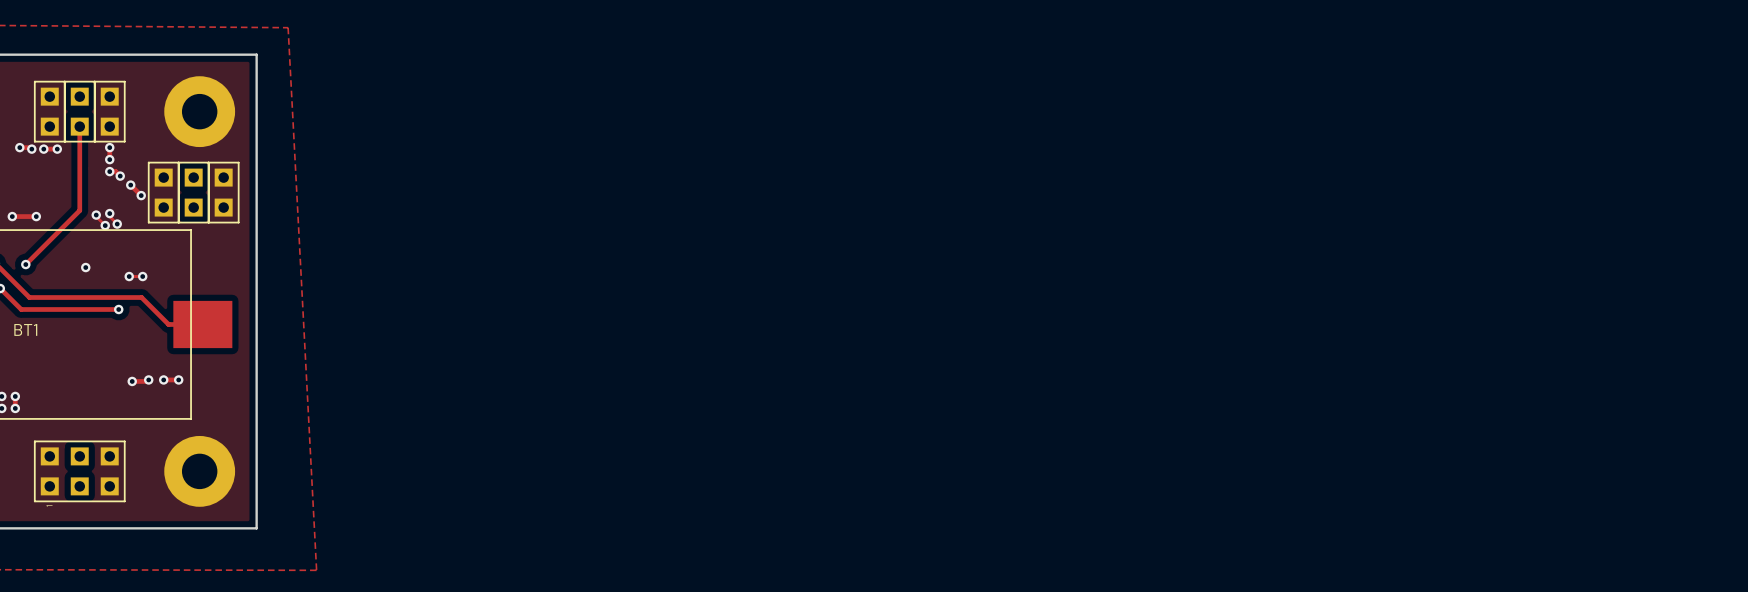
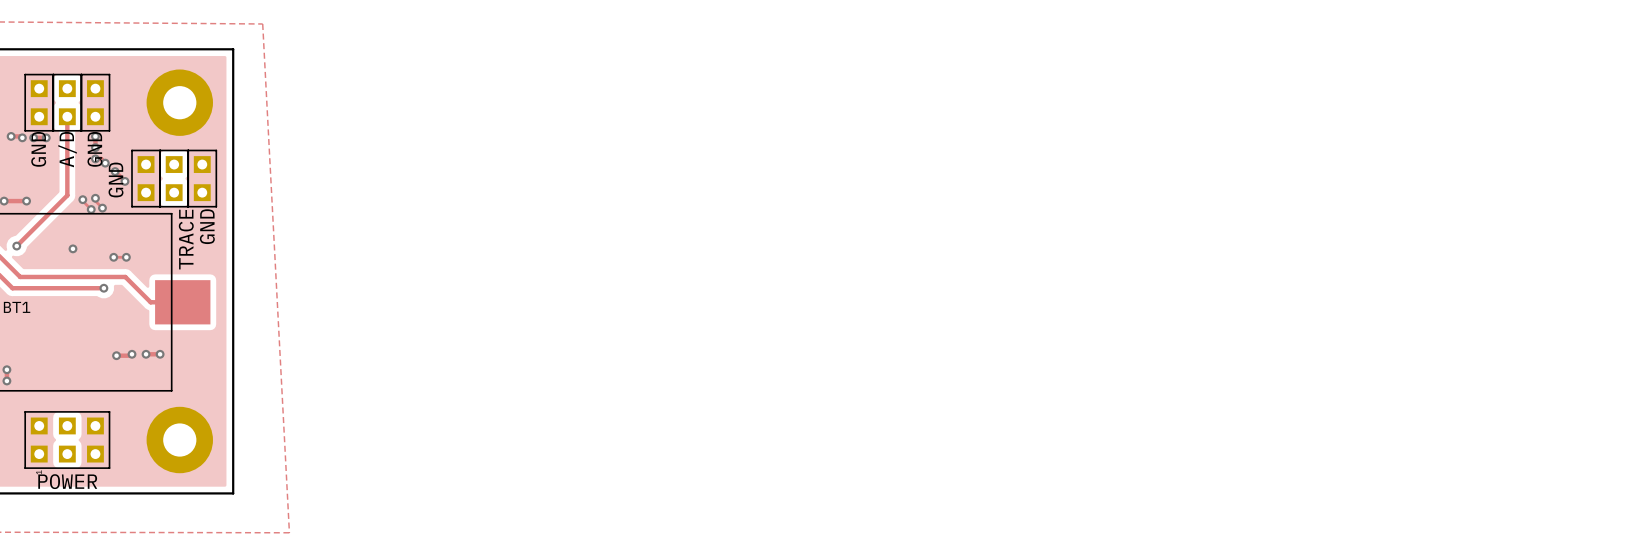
text: none -> A/D (67, 149)
text: none -> GND (38, 149)
text: none -> GND (94, 149)
text: none -> GND (116, 180)
text: none -> GND (207, 226)
text: none -> TRACE (186, 239)
text: none -> POWER (67, 481)

